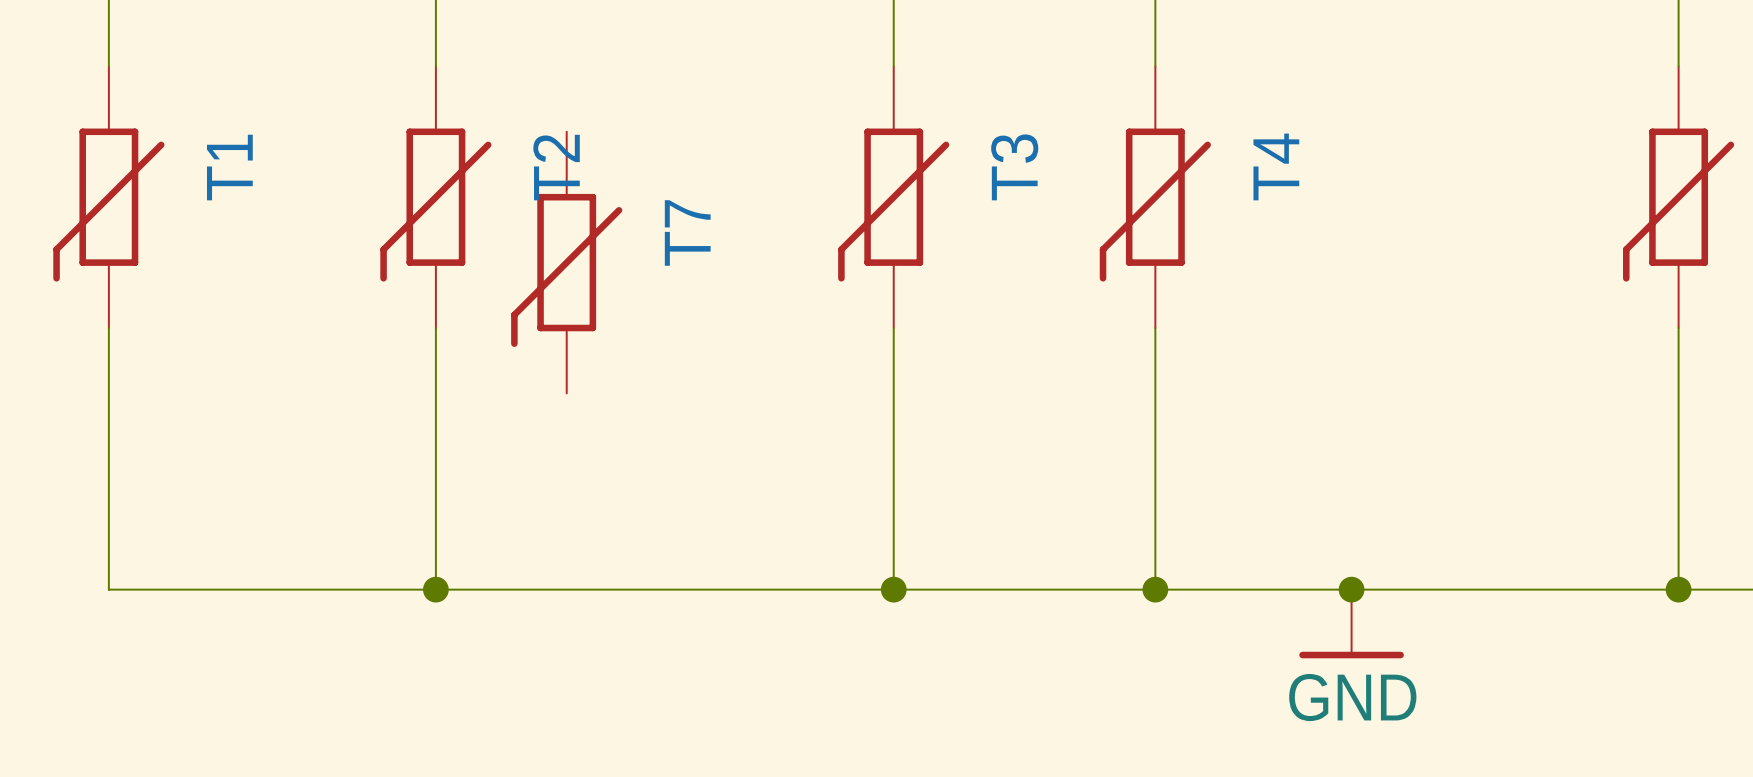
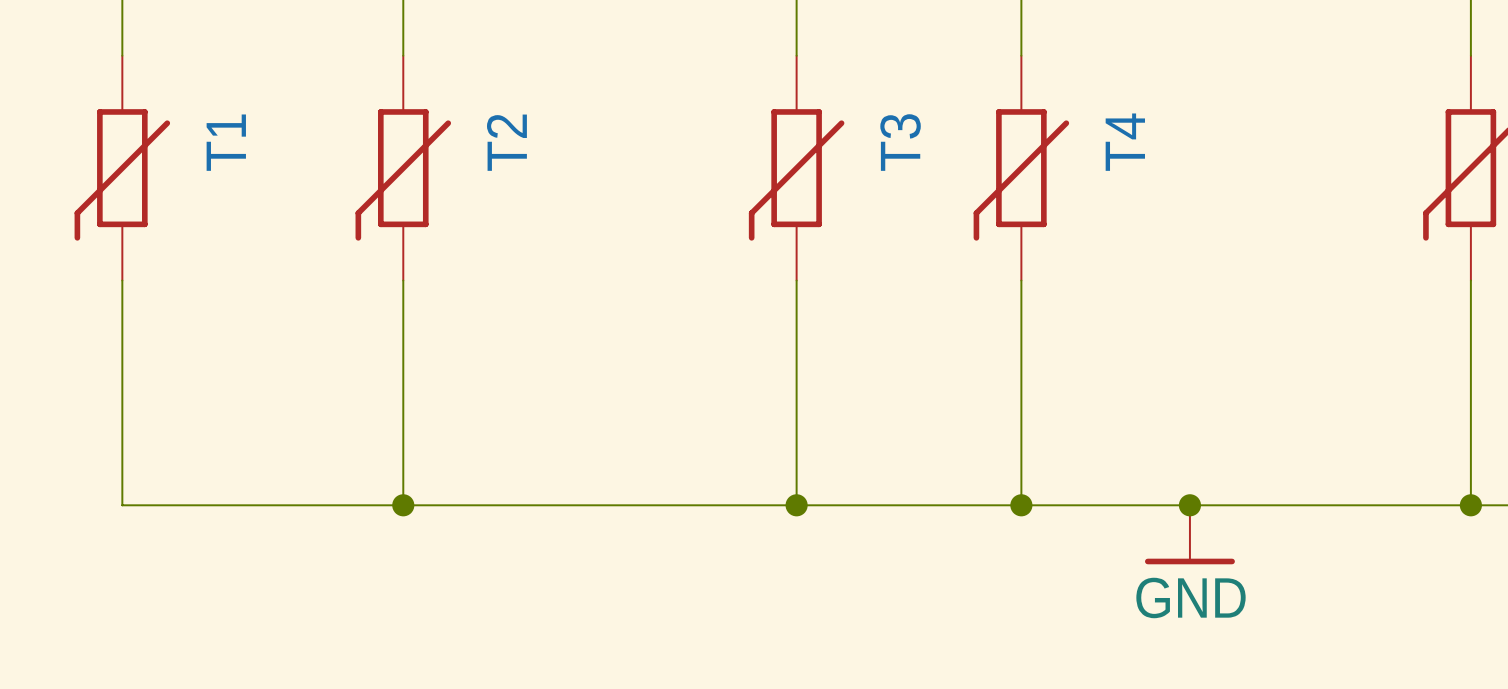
T7: (566, 262) -> none

